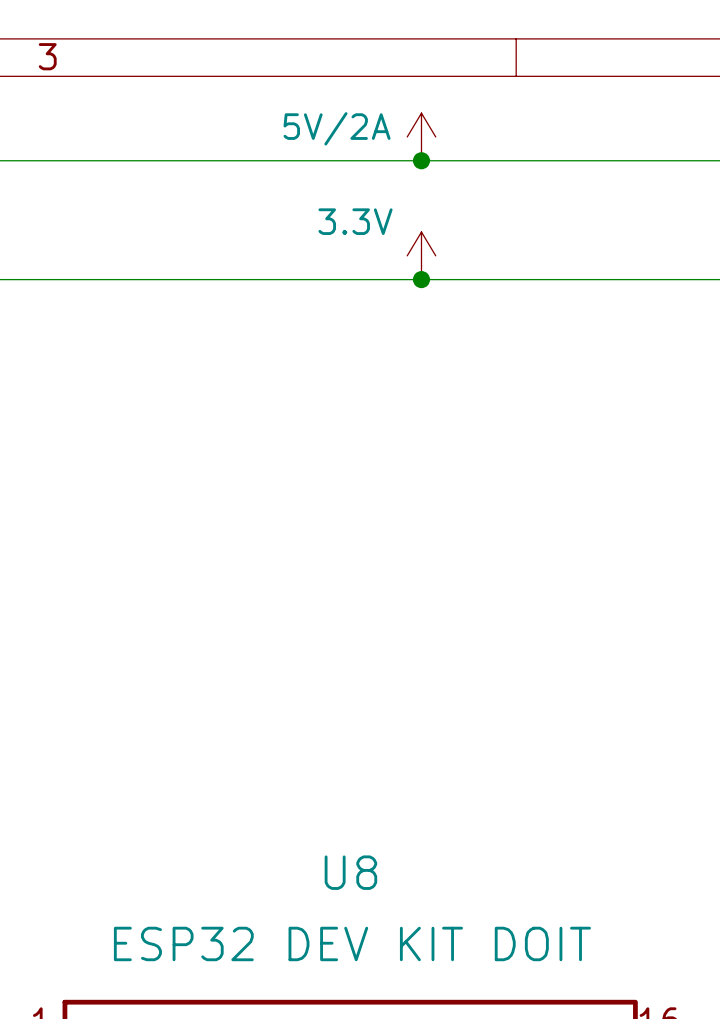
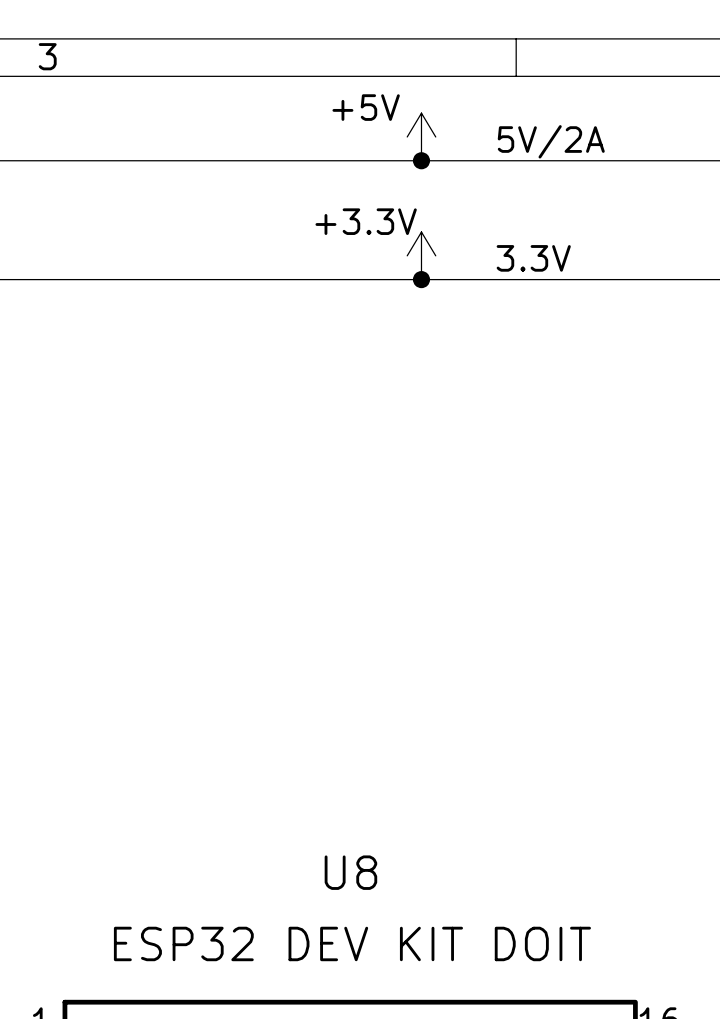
power symbol: 5V/2A (421, 136) -> +5V (421, 136)
label: none -> 5V/2A (551, 141)
power symbol: 3.3V (421, 255) -> +3.3V (421, 255)
label: none -> 3.3V (533, 258)

